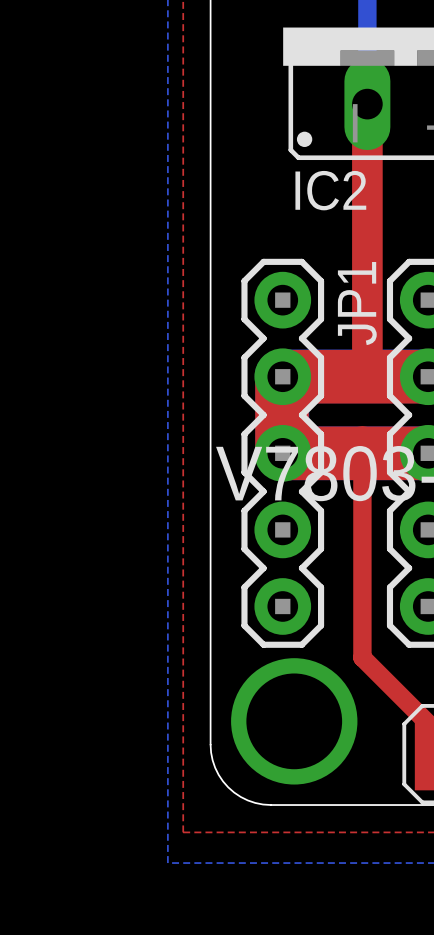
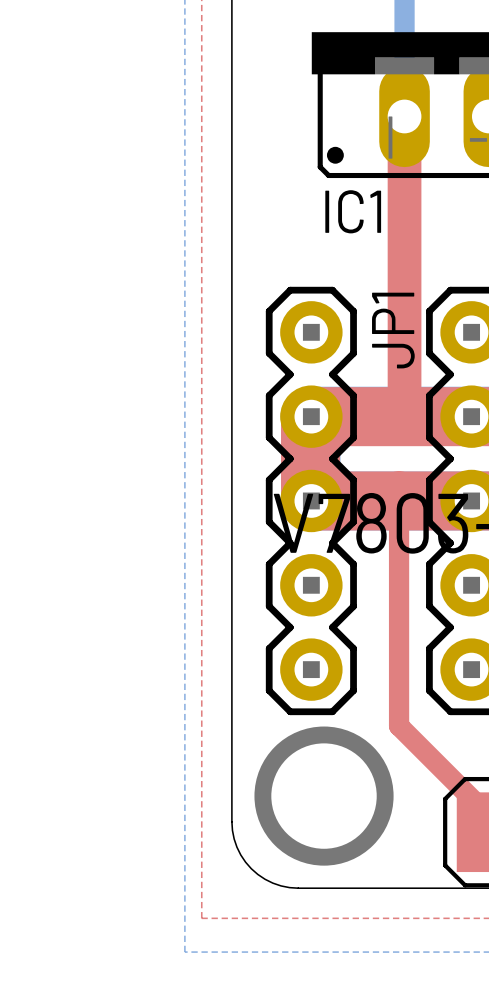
IC2 name: IC2 (330, 190) -> IC1 (353, 211)

